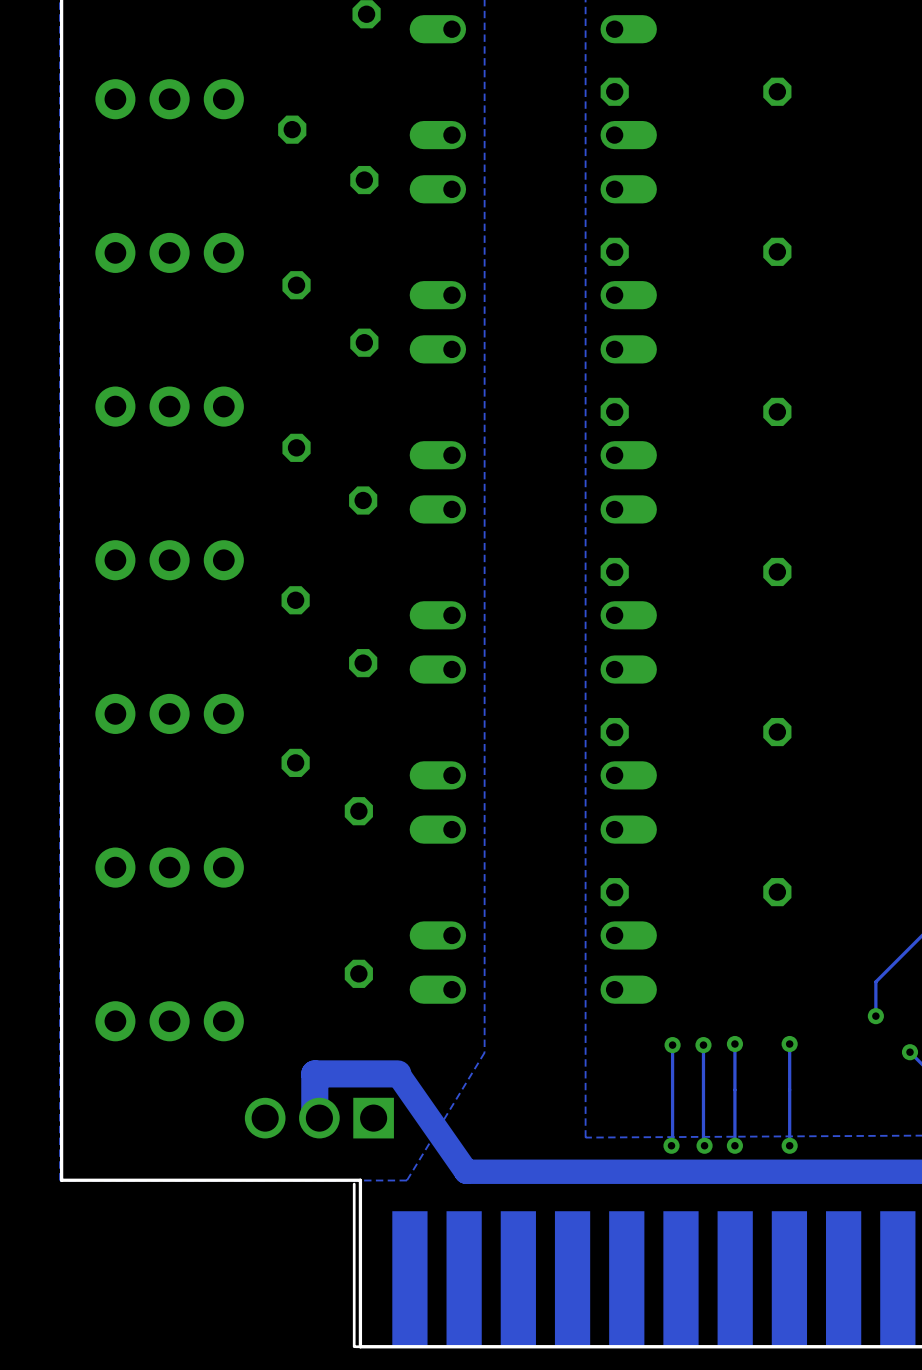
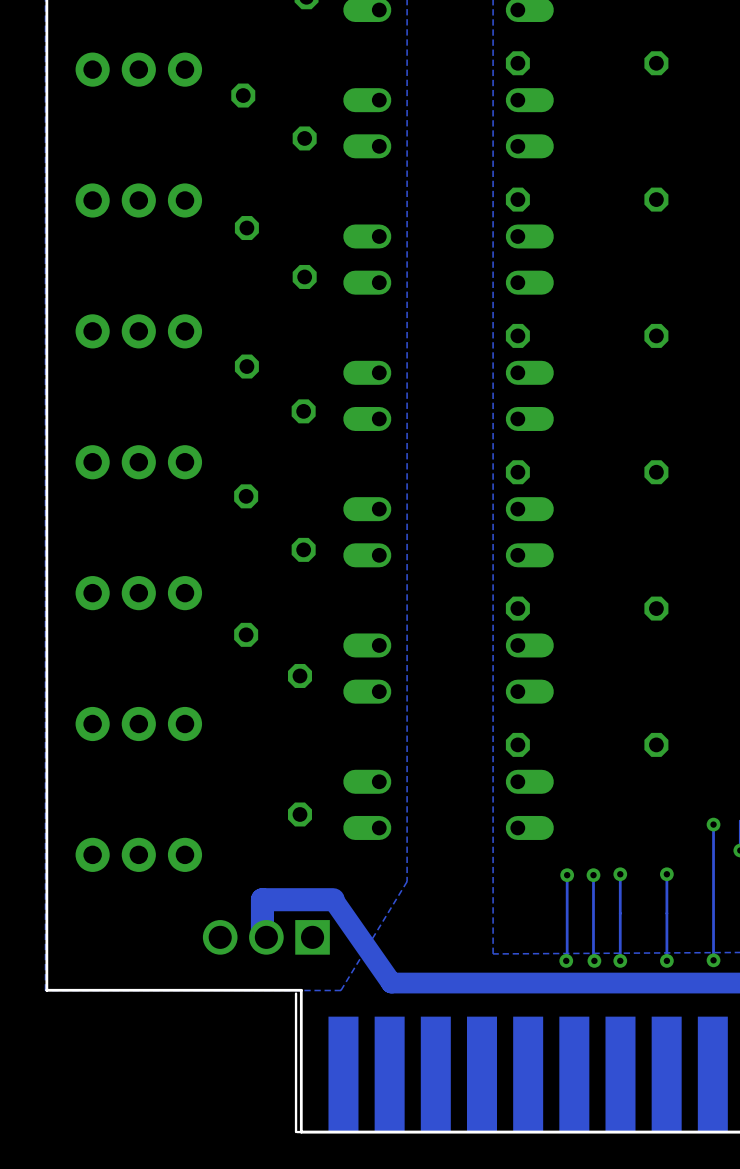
track: none -> (713, 824) (713, 960)
via: none -> (713, 824)
via: none -> (713, 960)

